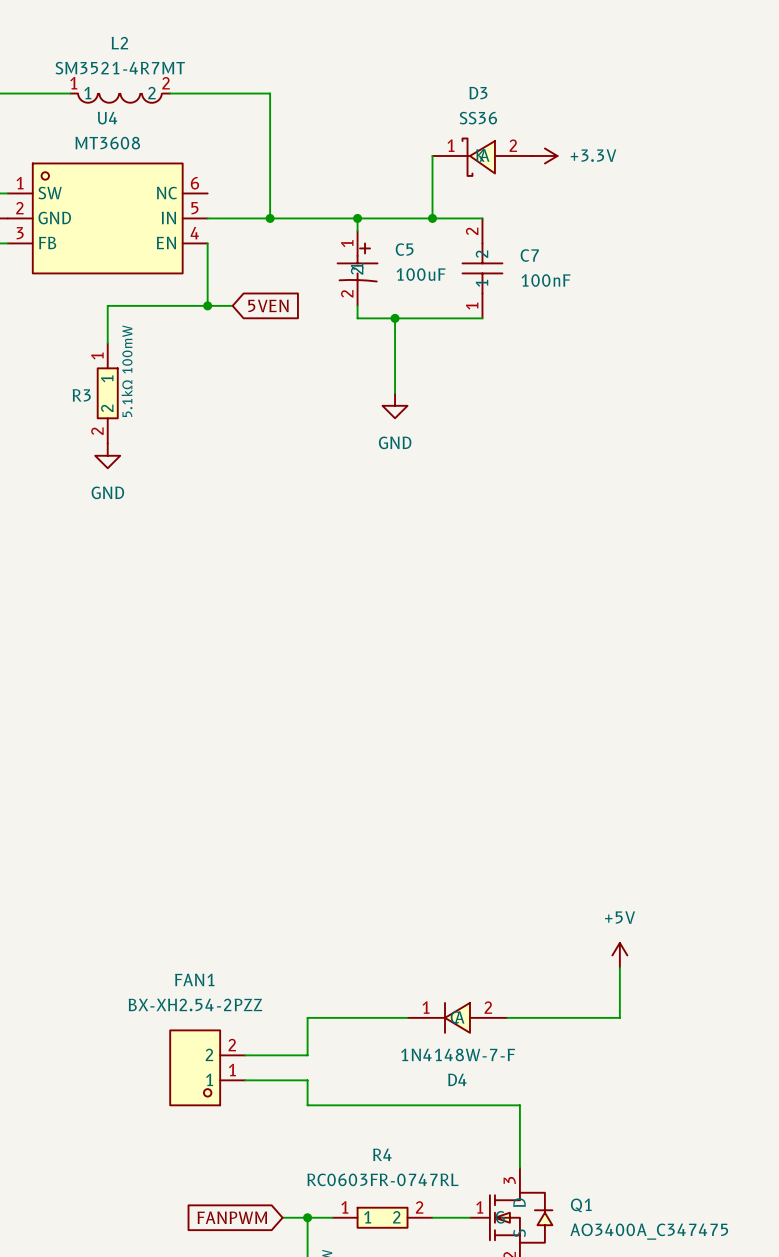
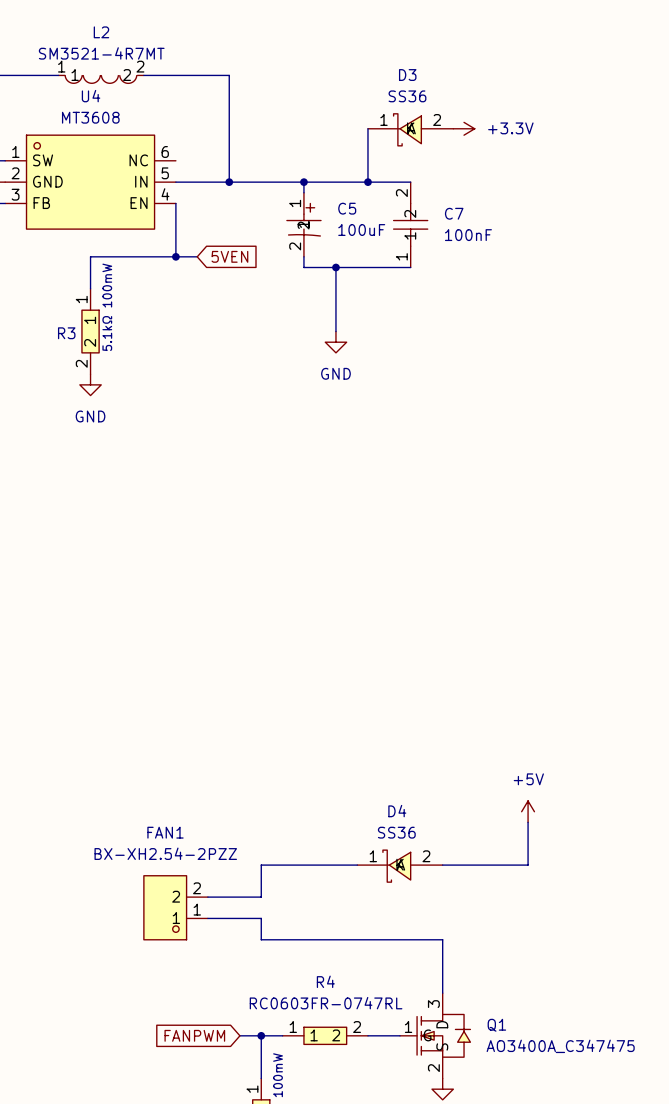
D4 symbol: [407, 1002, 508, 1033] -> [357, 850, 443, 883]
D4 value: 1N4148W-7-F (458, 1054) -> SS36 (396, 832)
D4 name position: D4 (457, 1079) -> D4 (397, 811)

